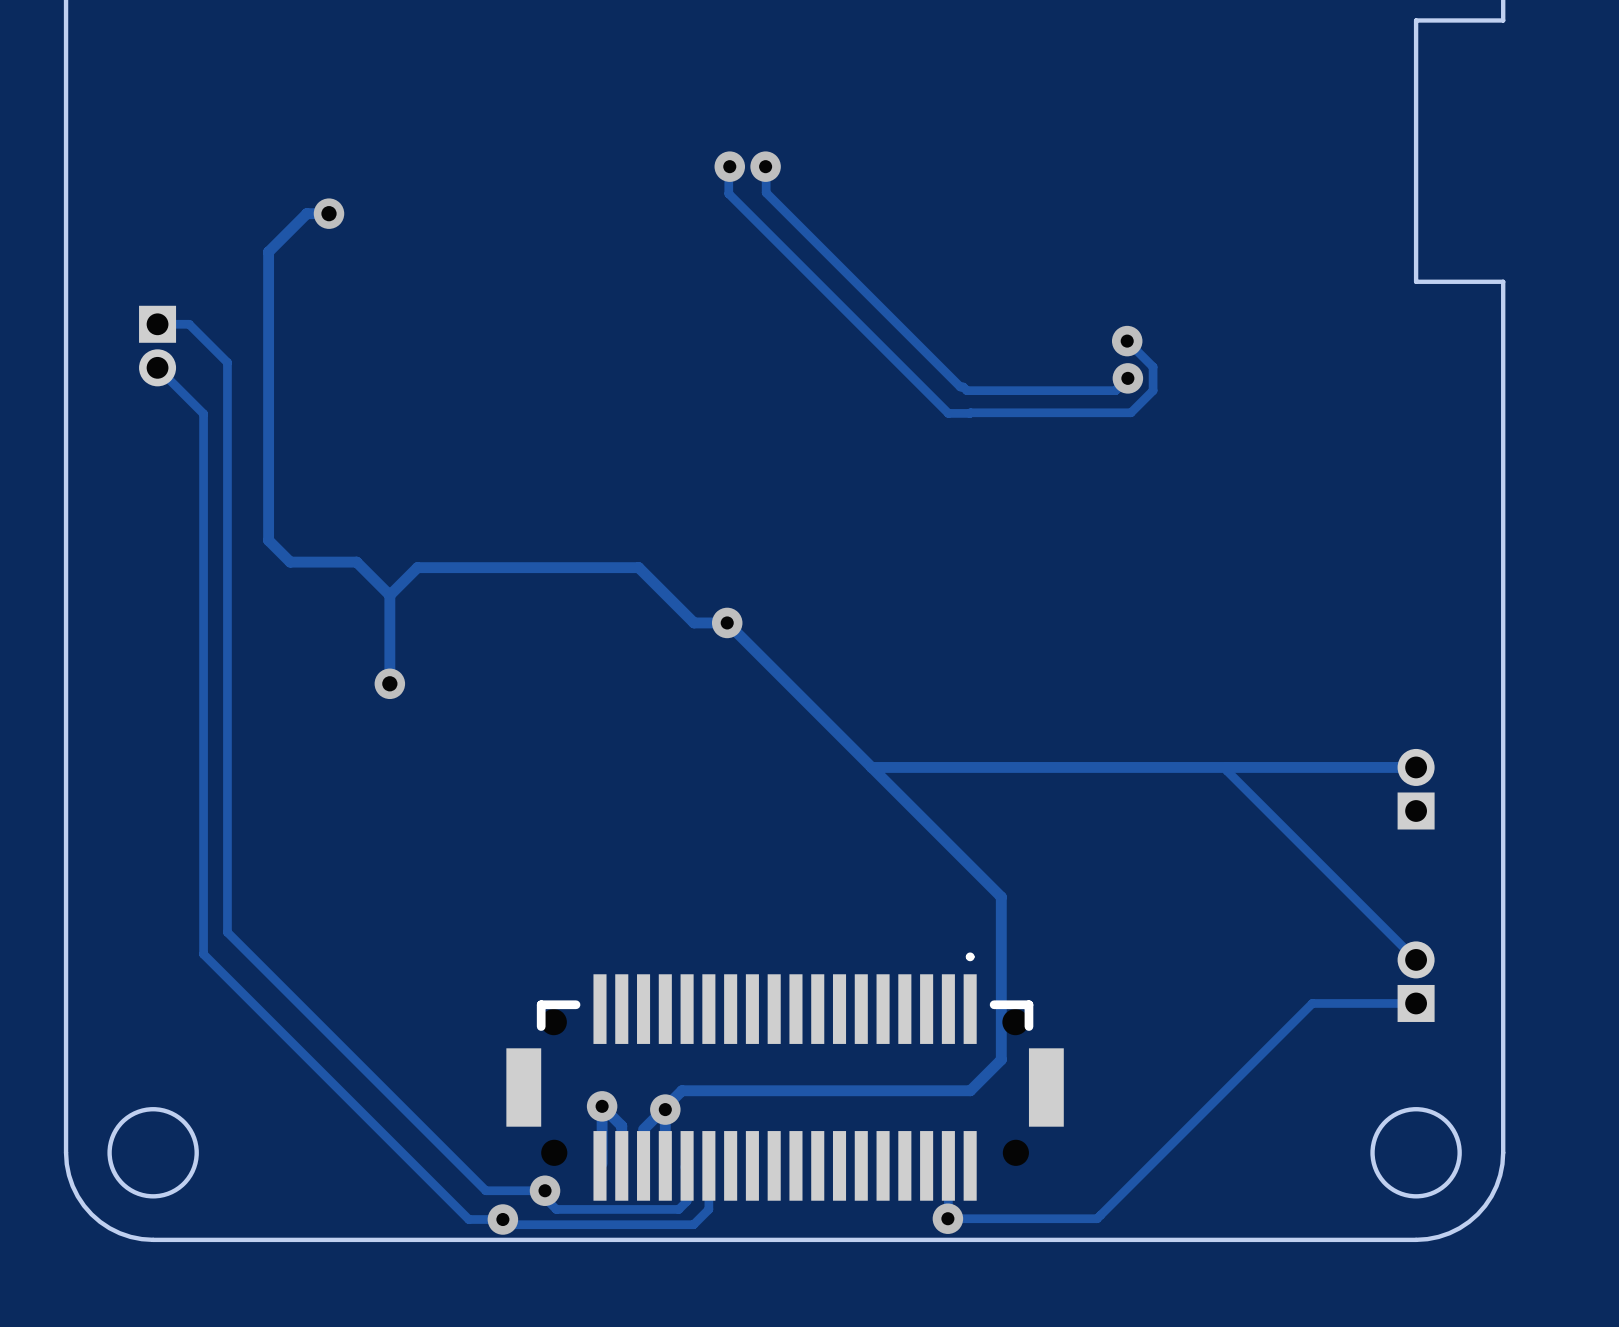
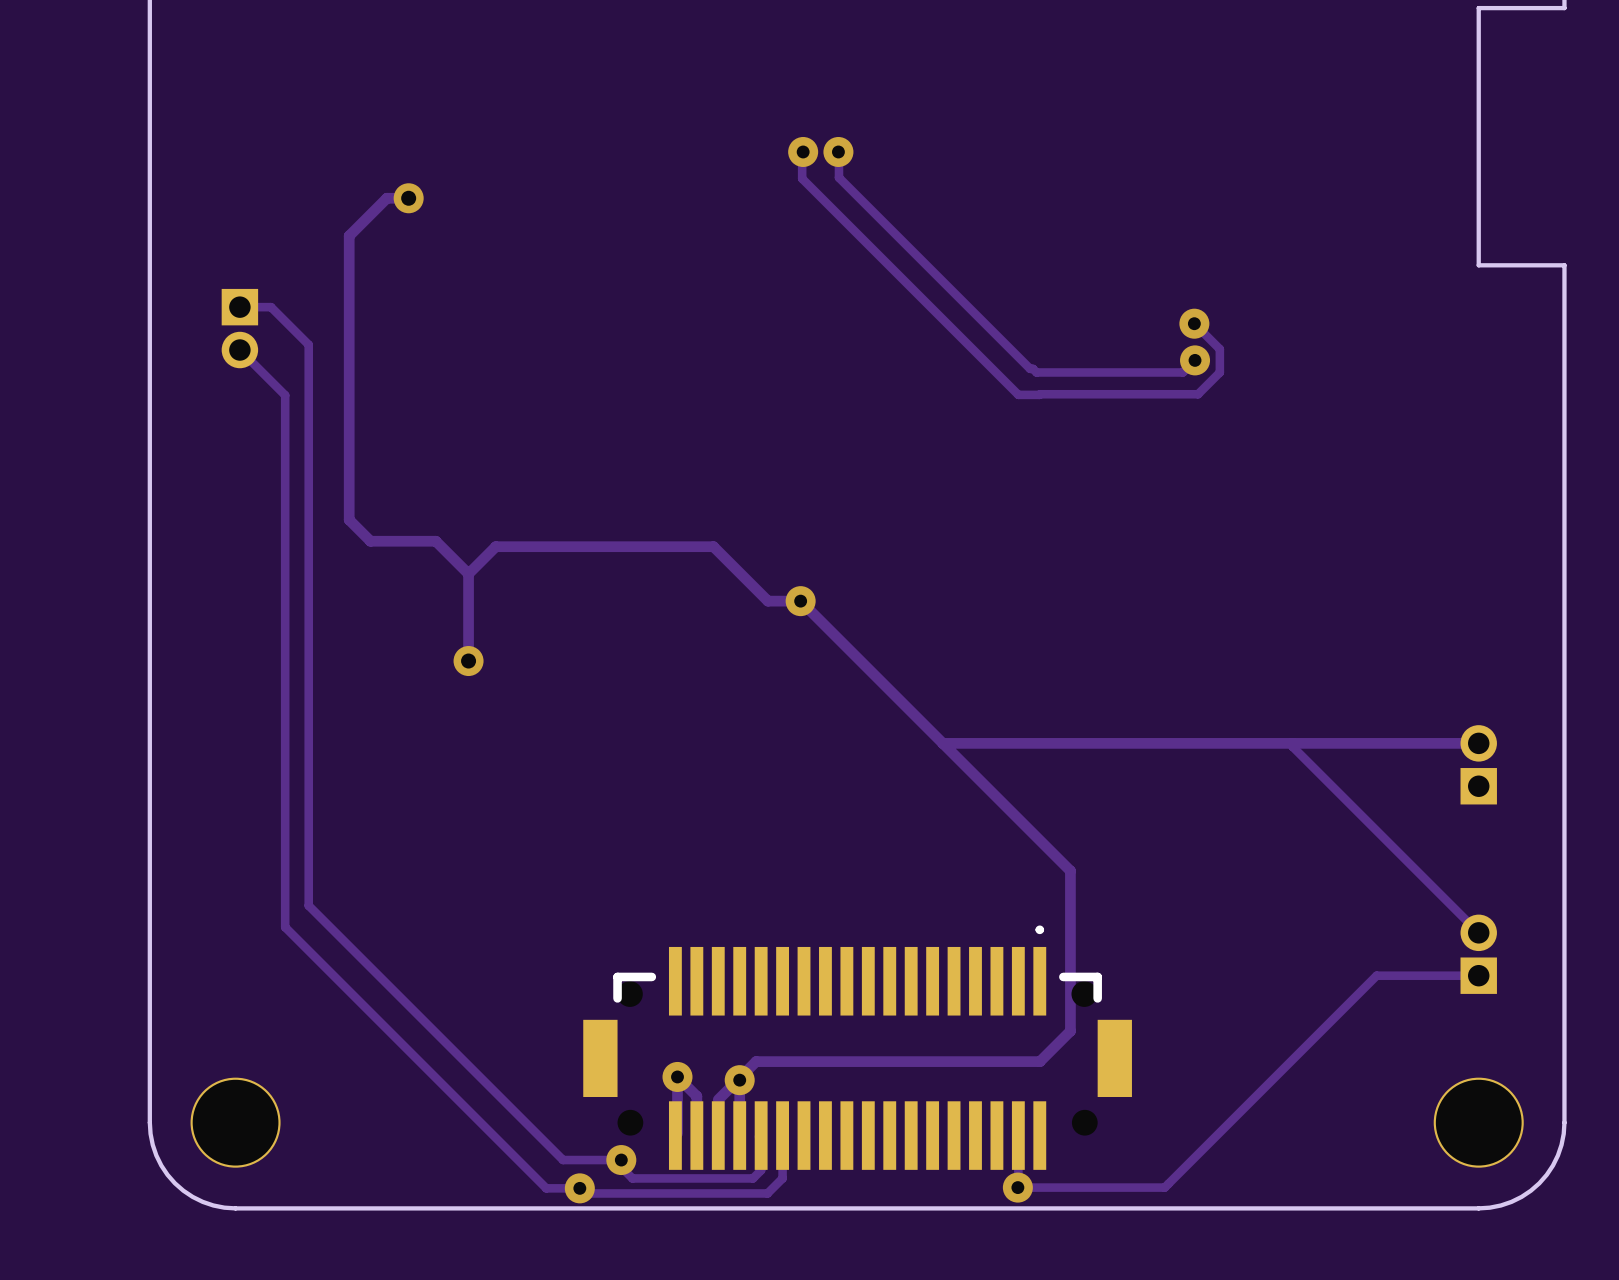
round board edge: [107, 1107, 199, 1199] -> none
round board edge: [1370, 1107, 1462, 1199] -> none
part: none -> (235, 1122)
part: none -> (1478, 1122)

